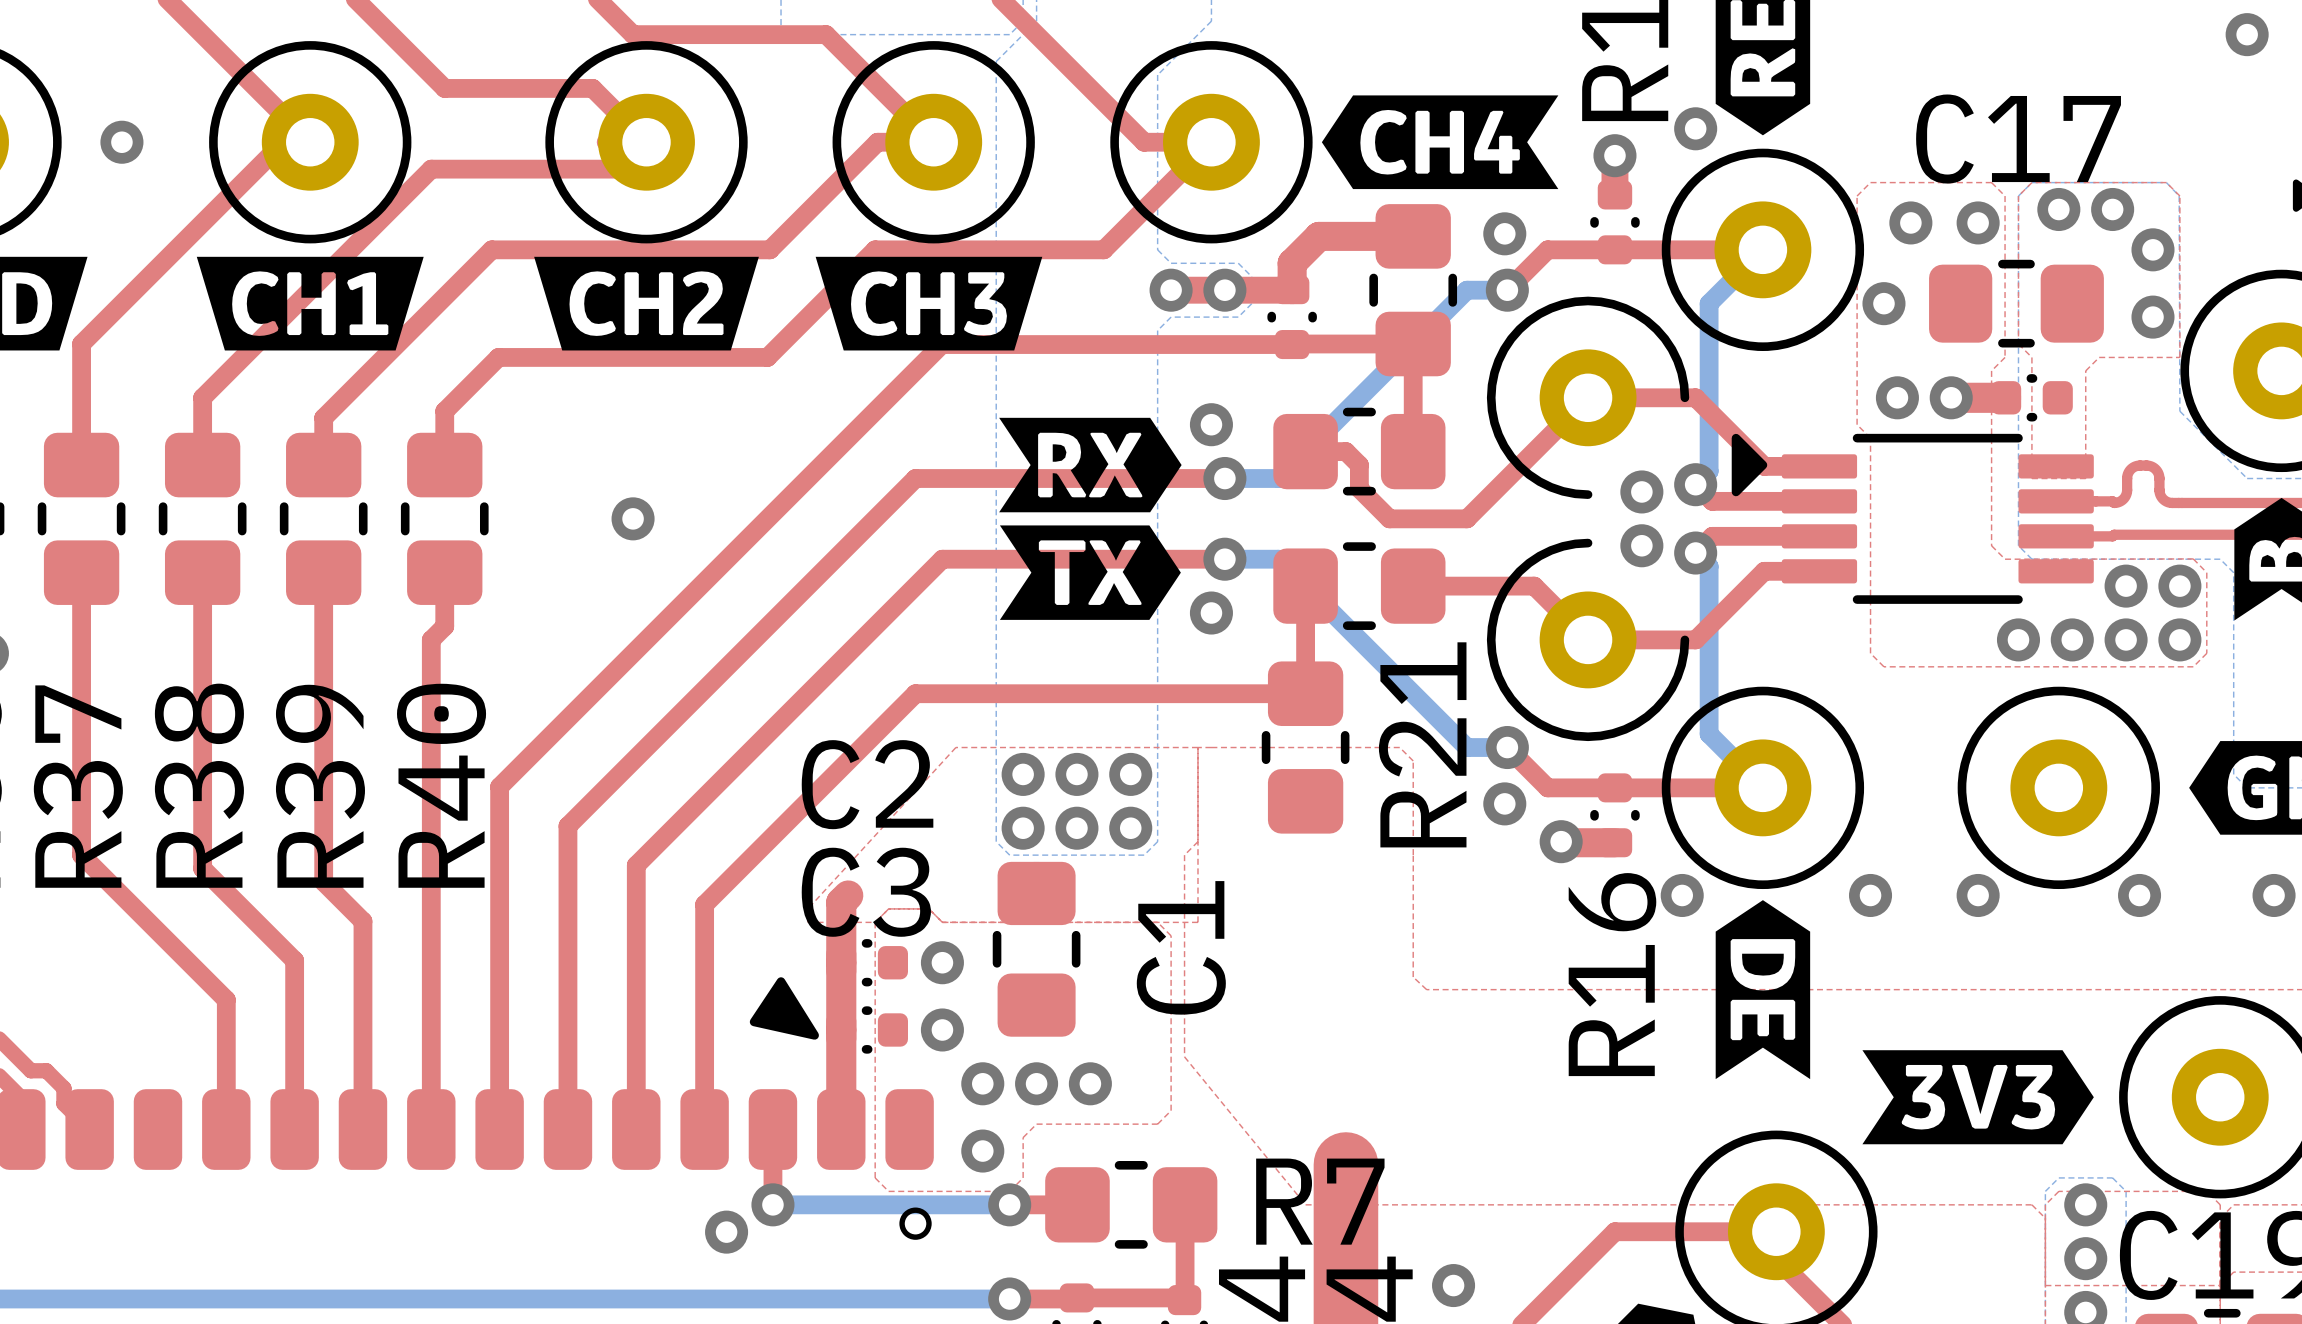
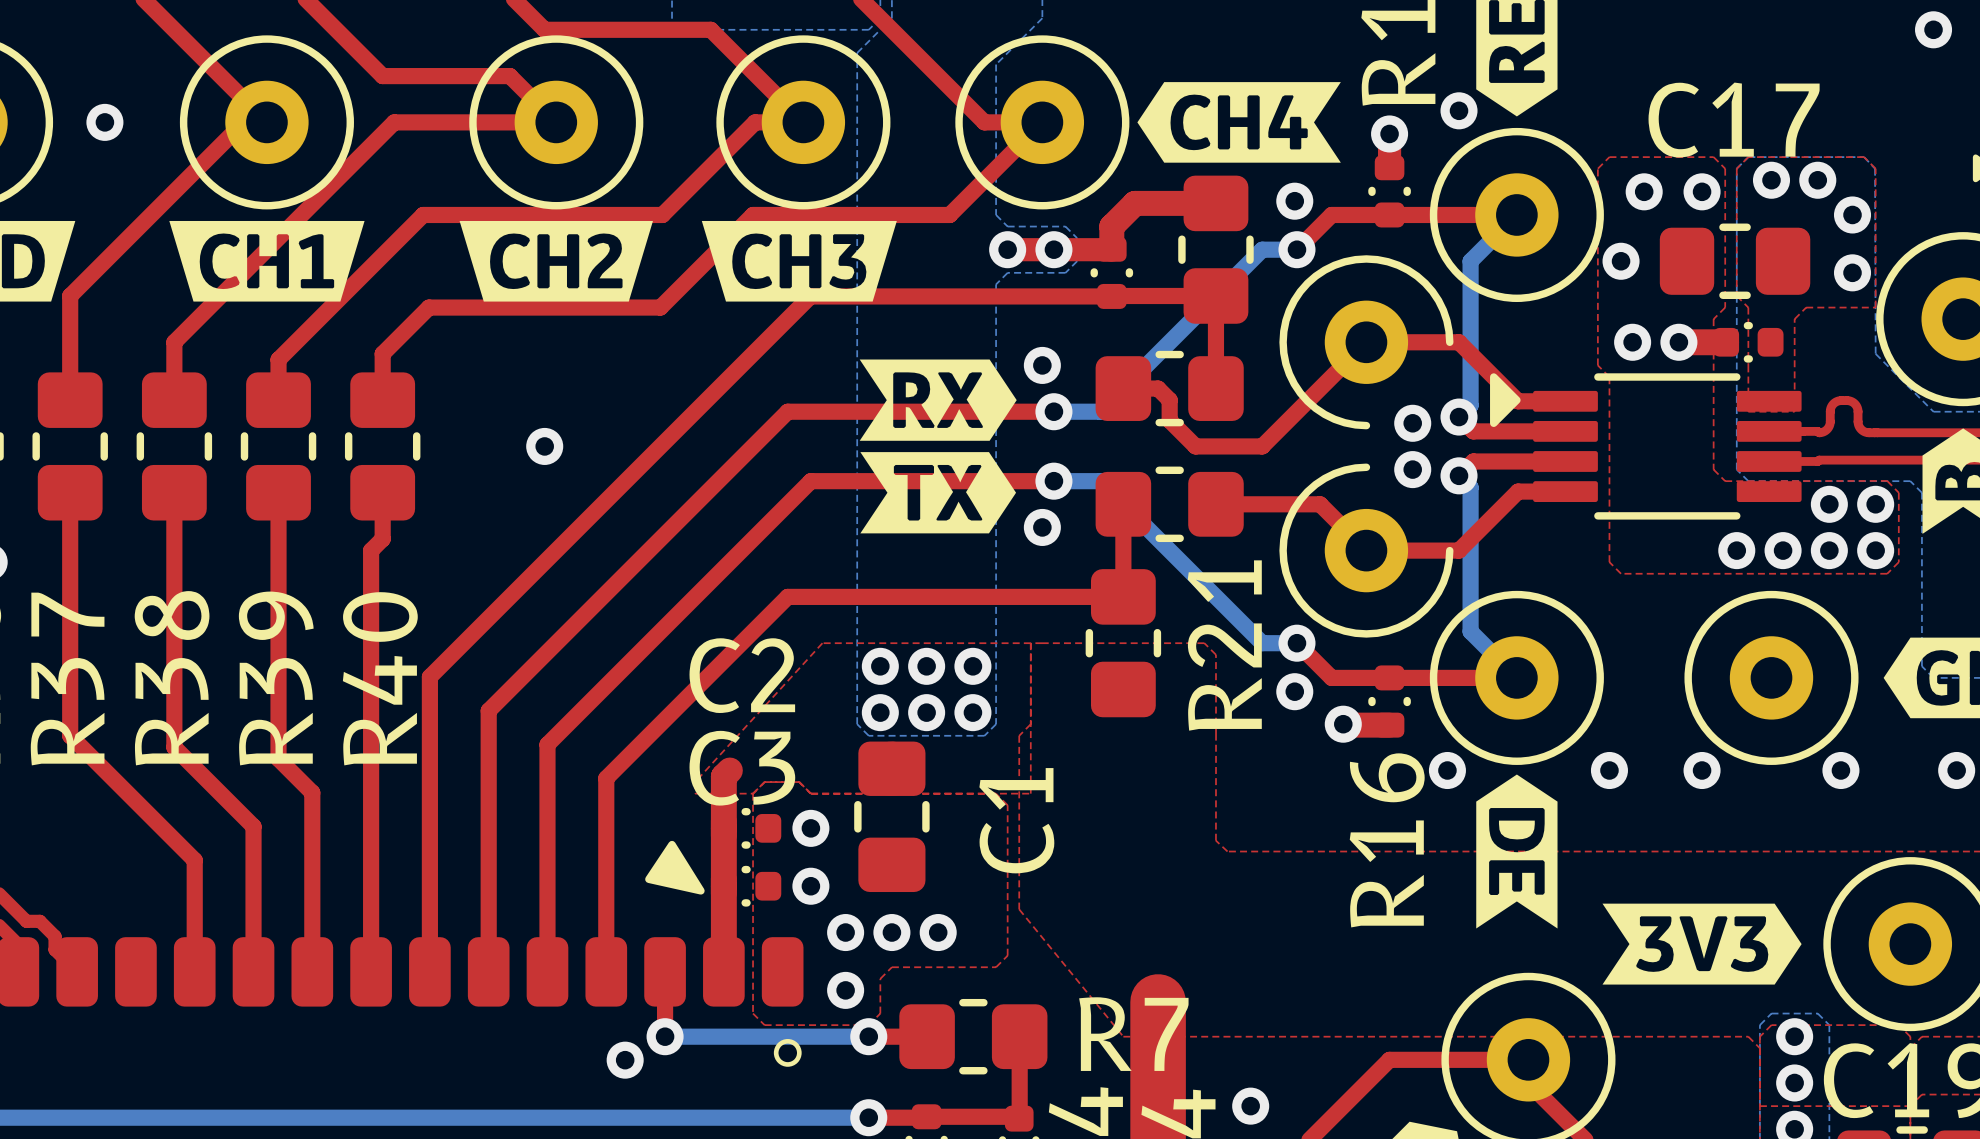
top track: (646, 142) (619, 169) (431, 169) -> (521, 122) (394, 122) (371, 145)

